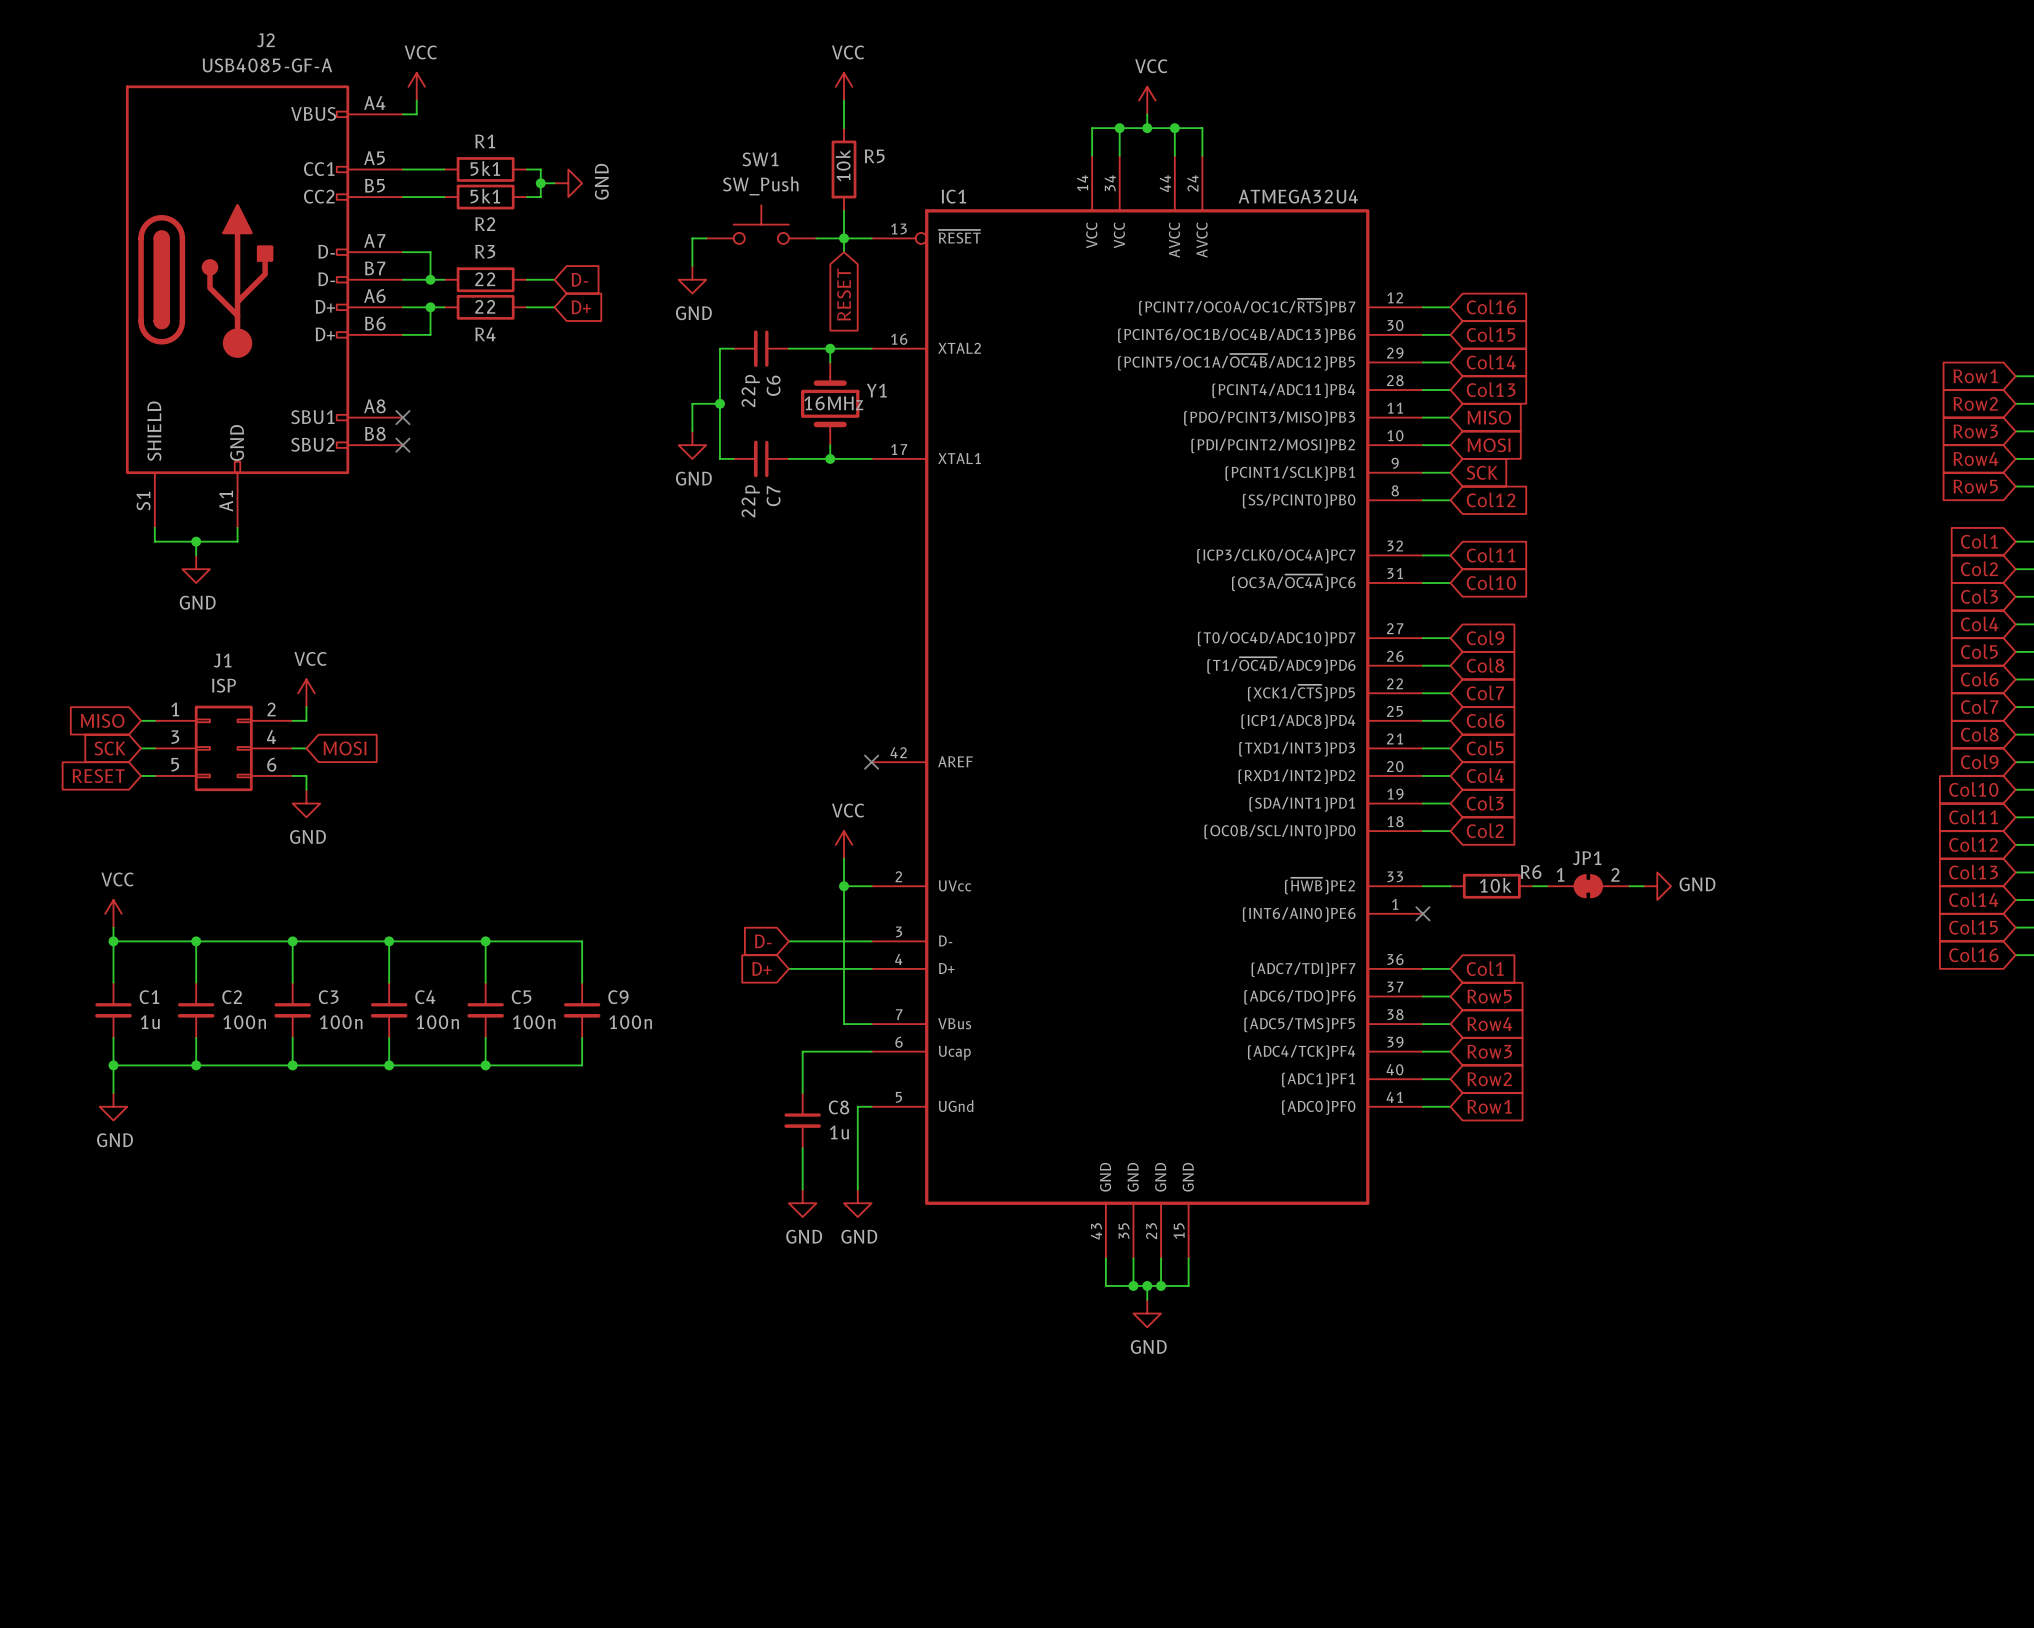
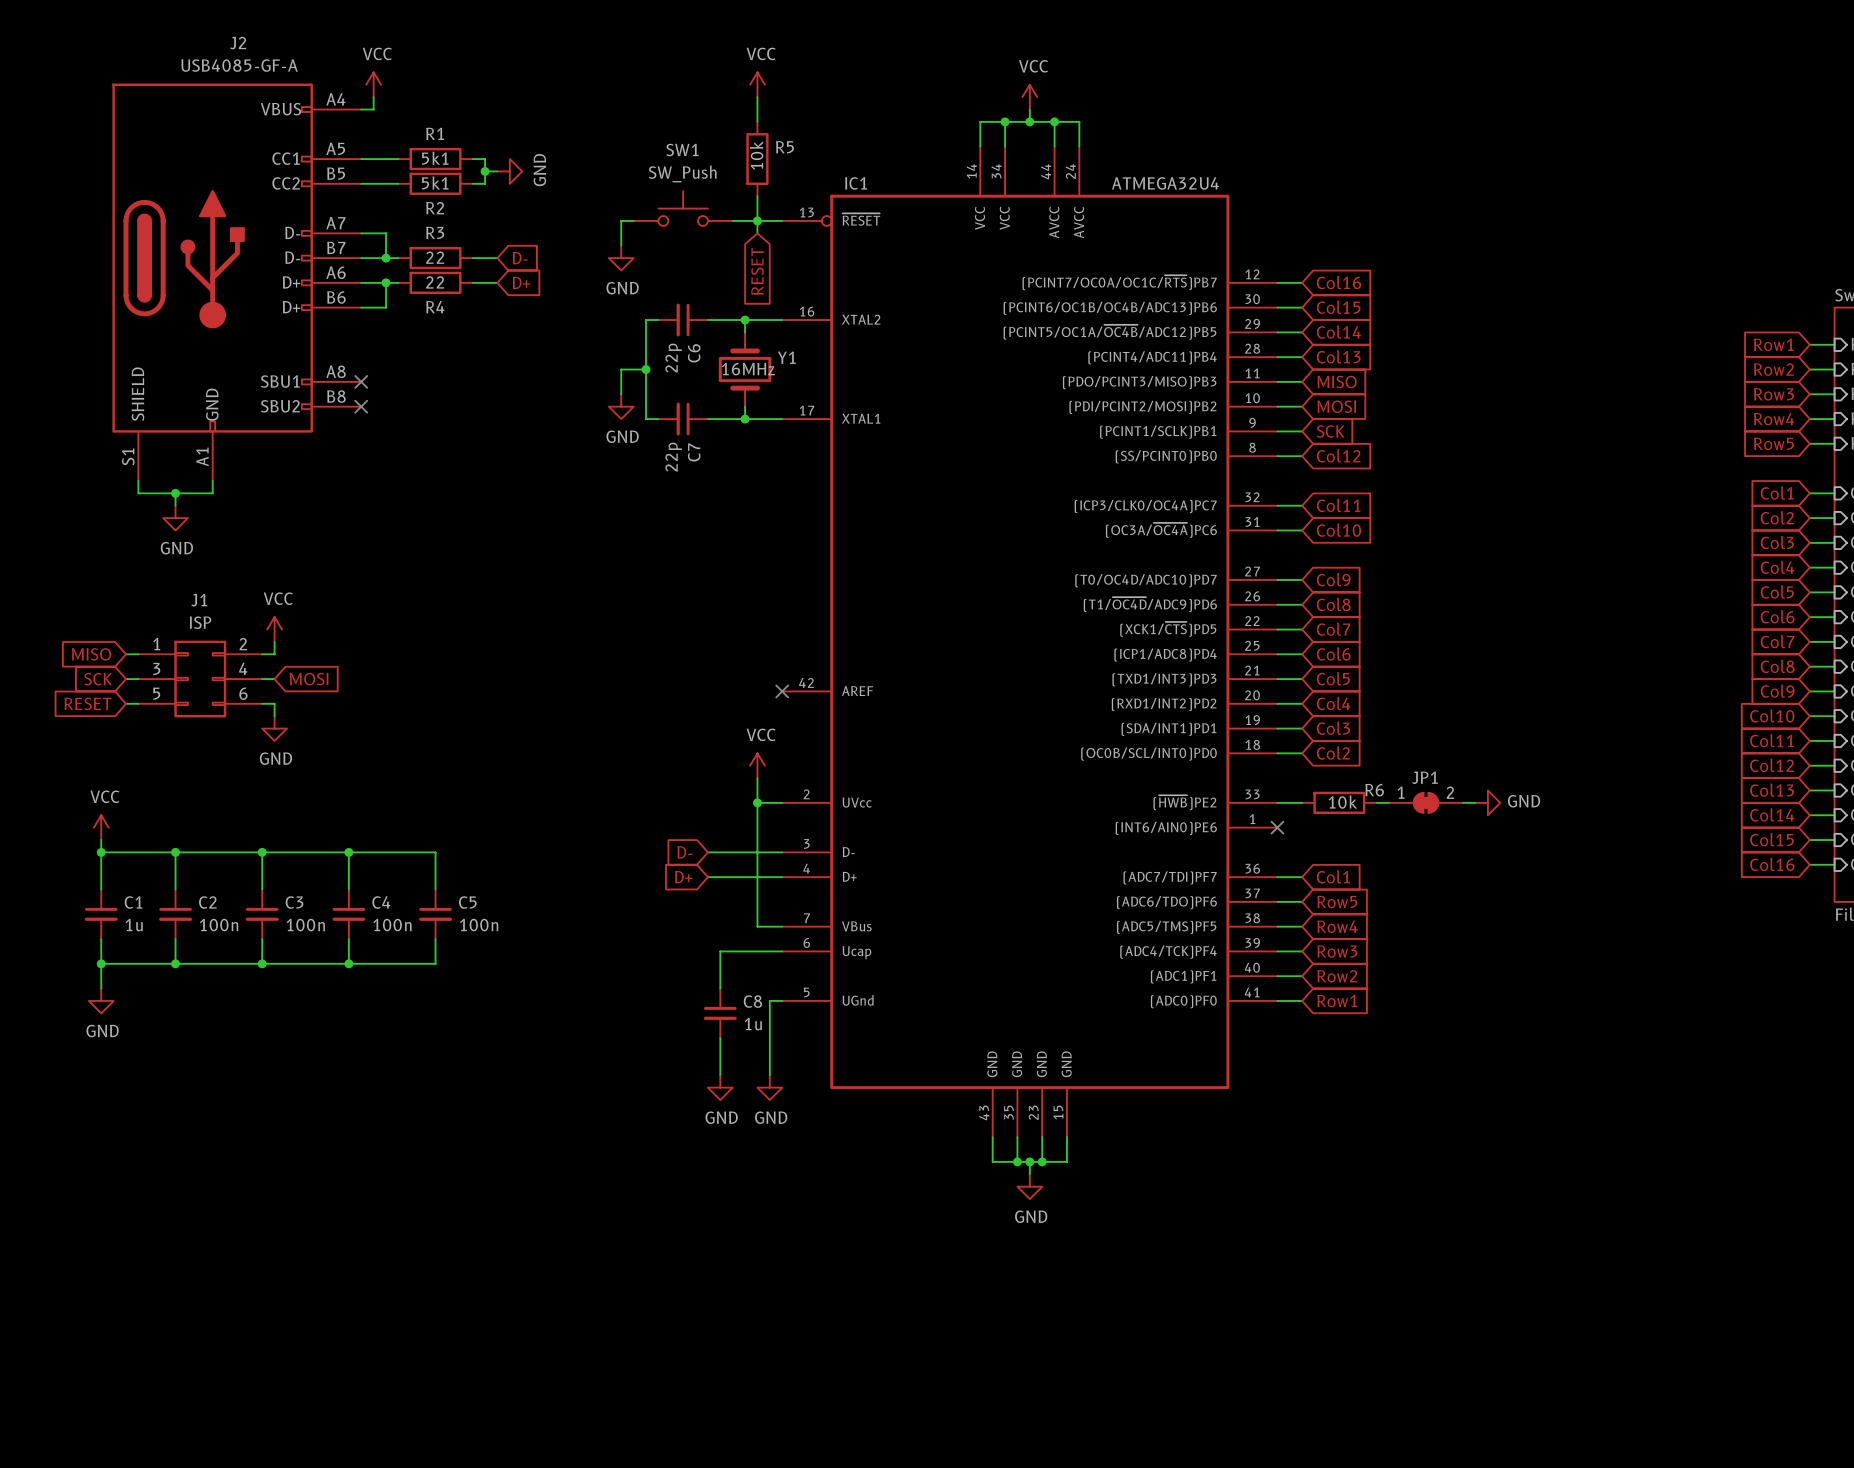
wire: (485, 941) (582, 941) (582, 982) -> none
junction: (485, 941) -> none
C9: 100n (582, 1010) -> none
wire: (582, 1037) (582, 1065) (485, 1065) -> none
junction: (485, 1065) -> none

